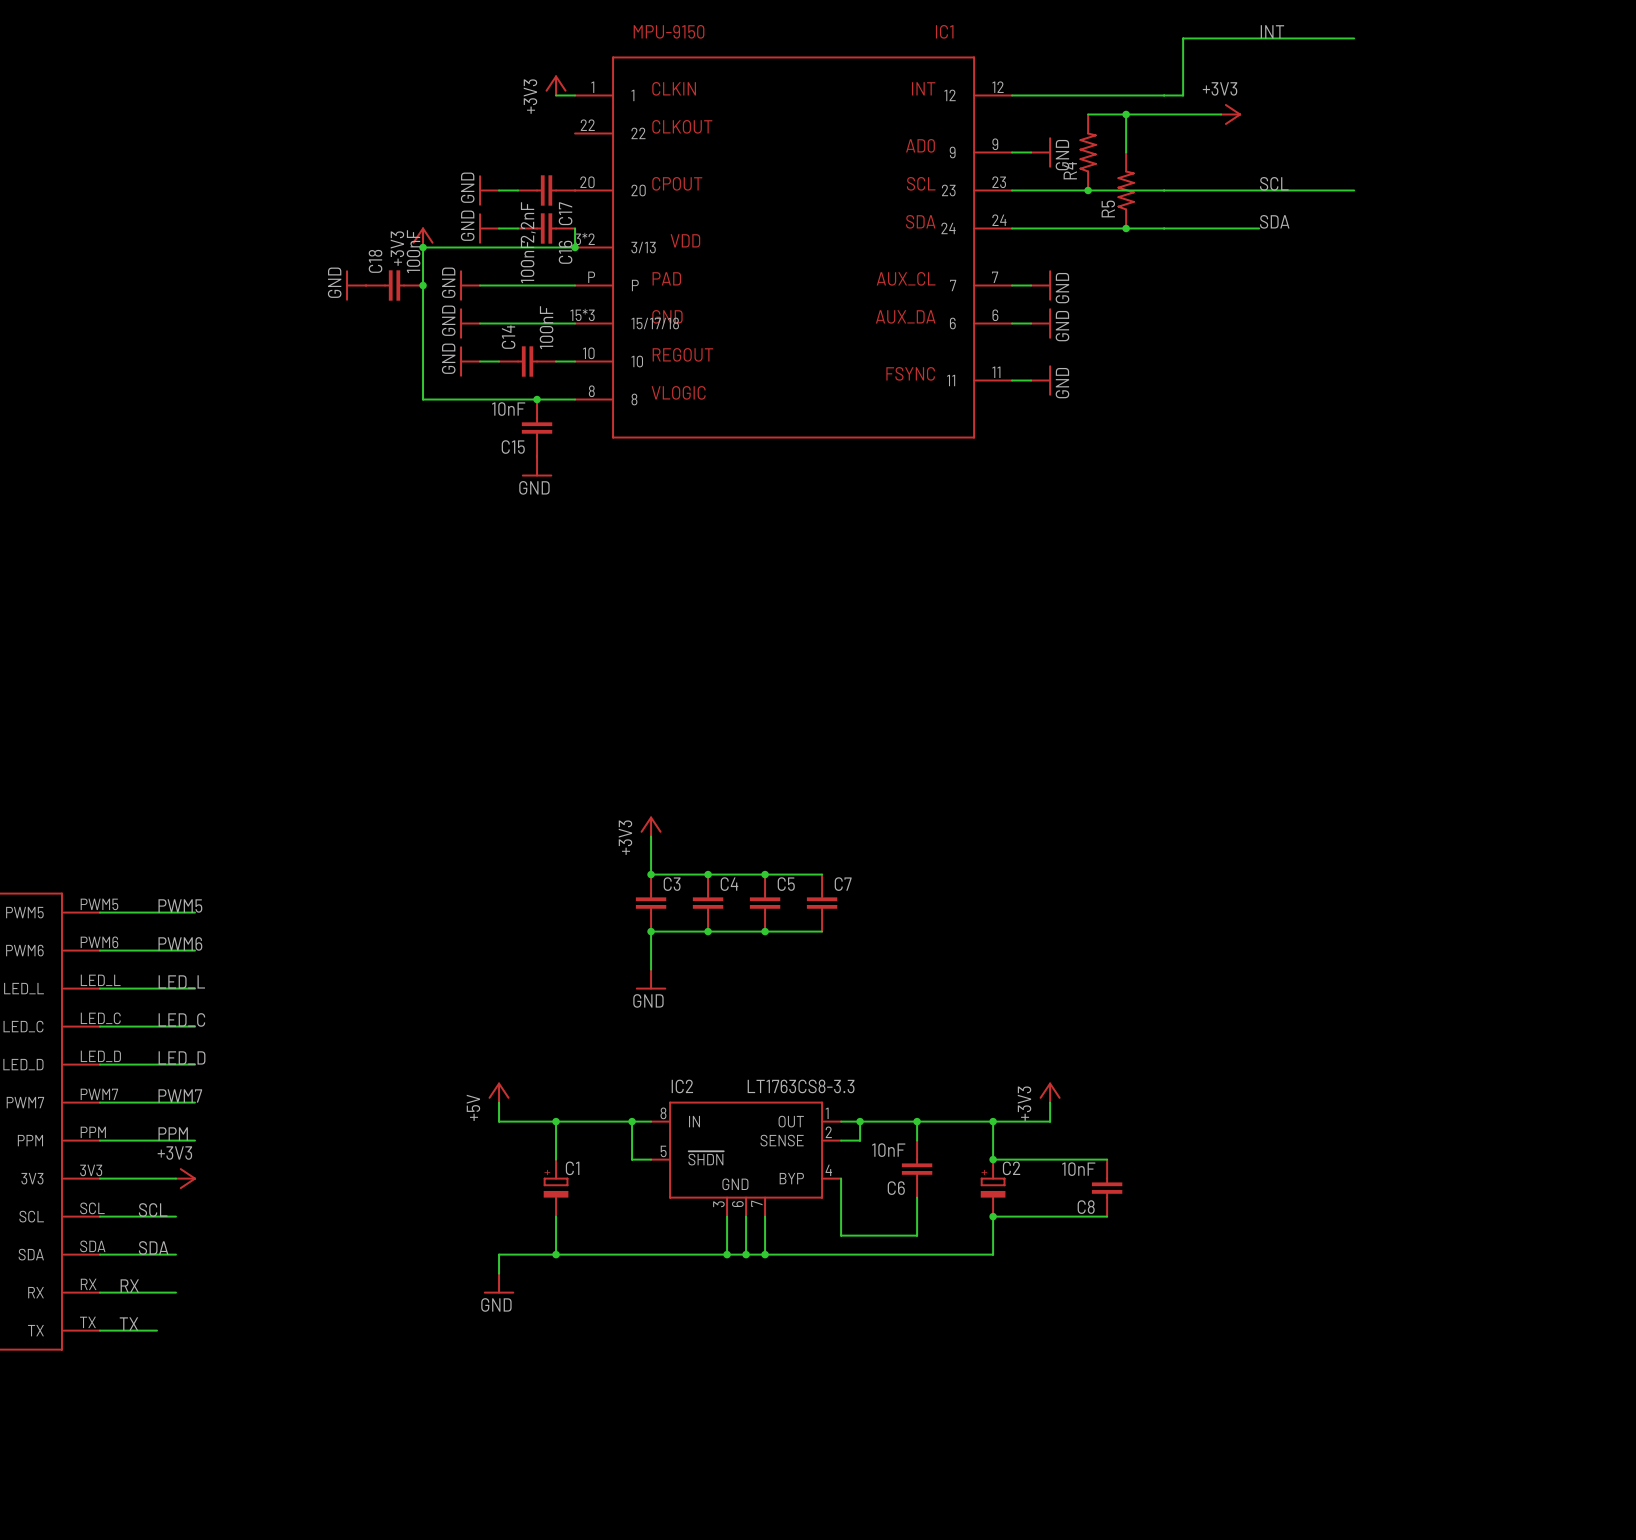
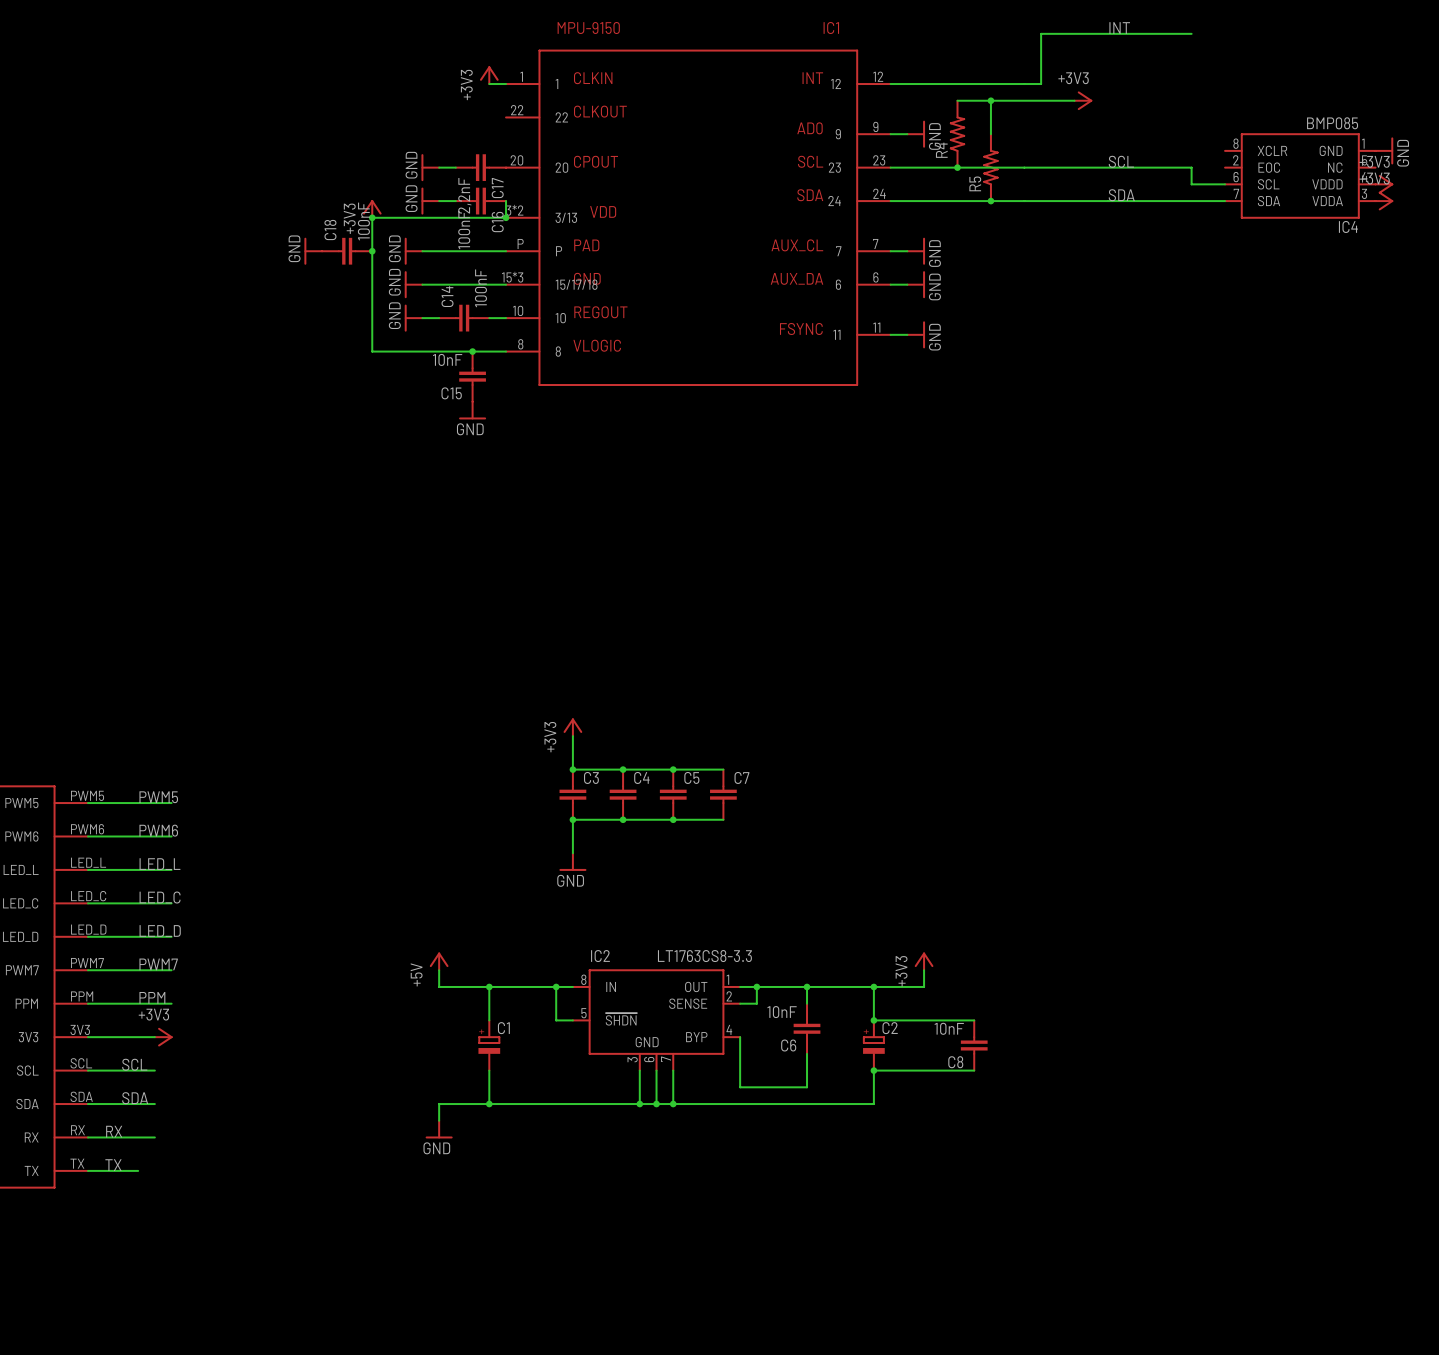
power symbol: none -> GND (1384, 150)
wire: none -> (1191, 167) (1191, 184) (1225, 184)
IC4: none -> BMP085 (1300, 175)
power symbol: none -> +3V3 (1384, 184)
wire: none -> (1108, 201) (1225, 201)
power symbol: none -> +3V3 (1384, 201)

